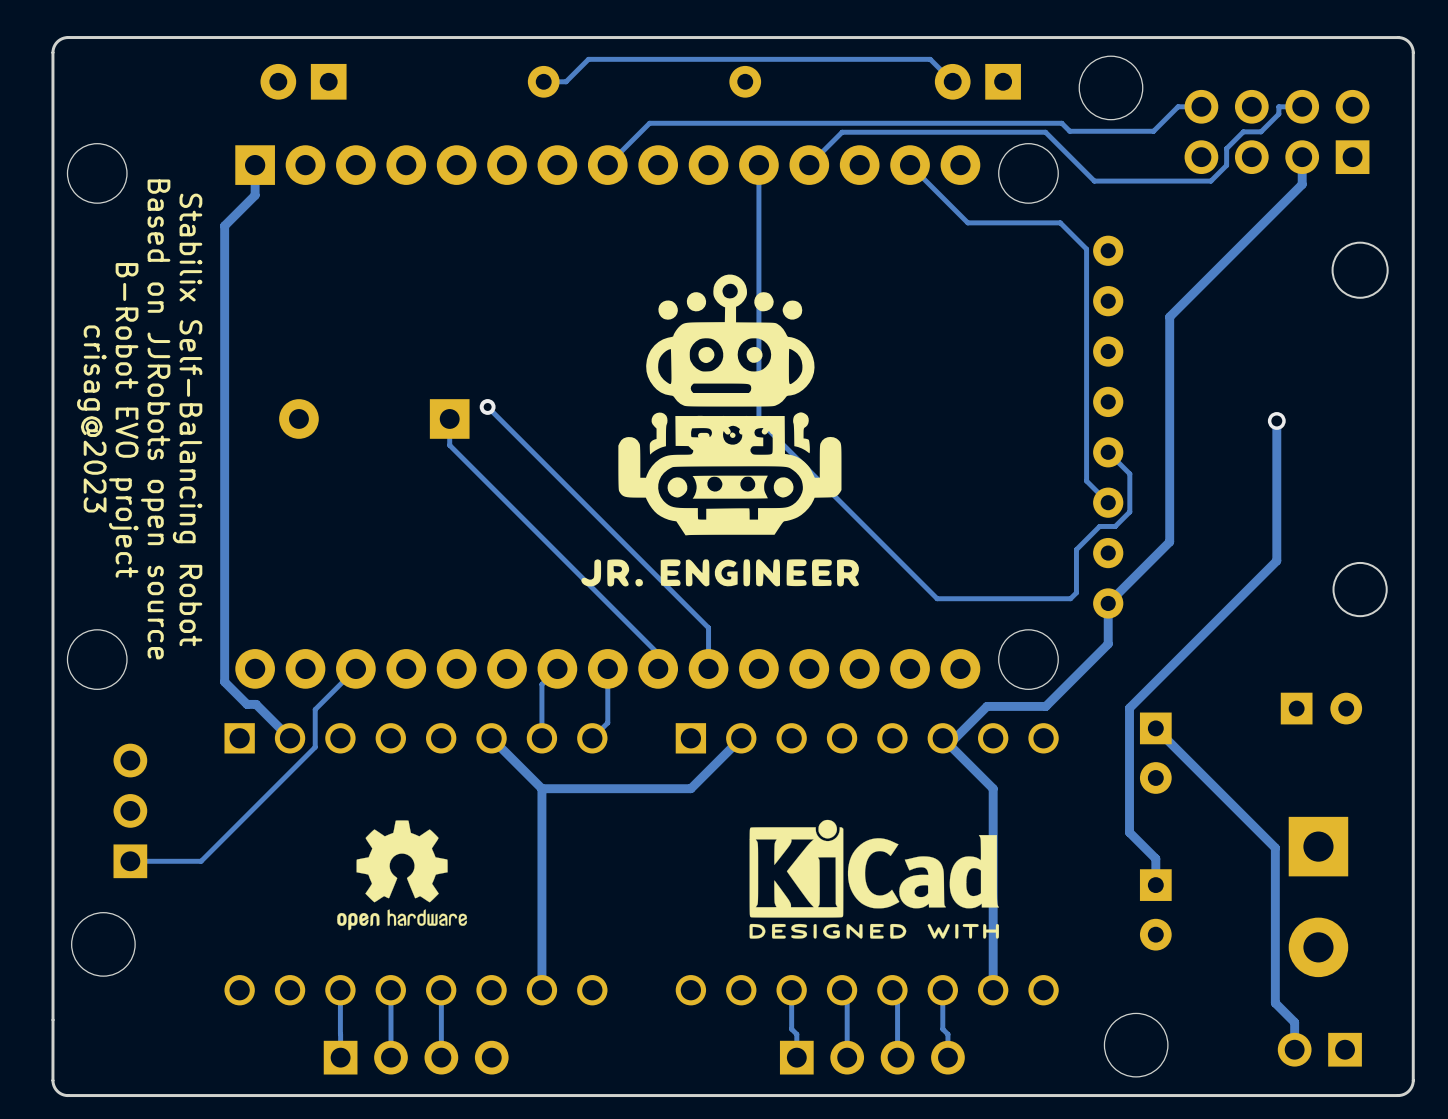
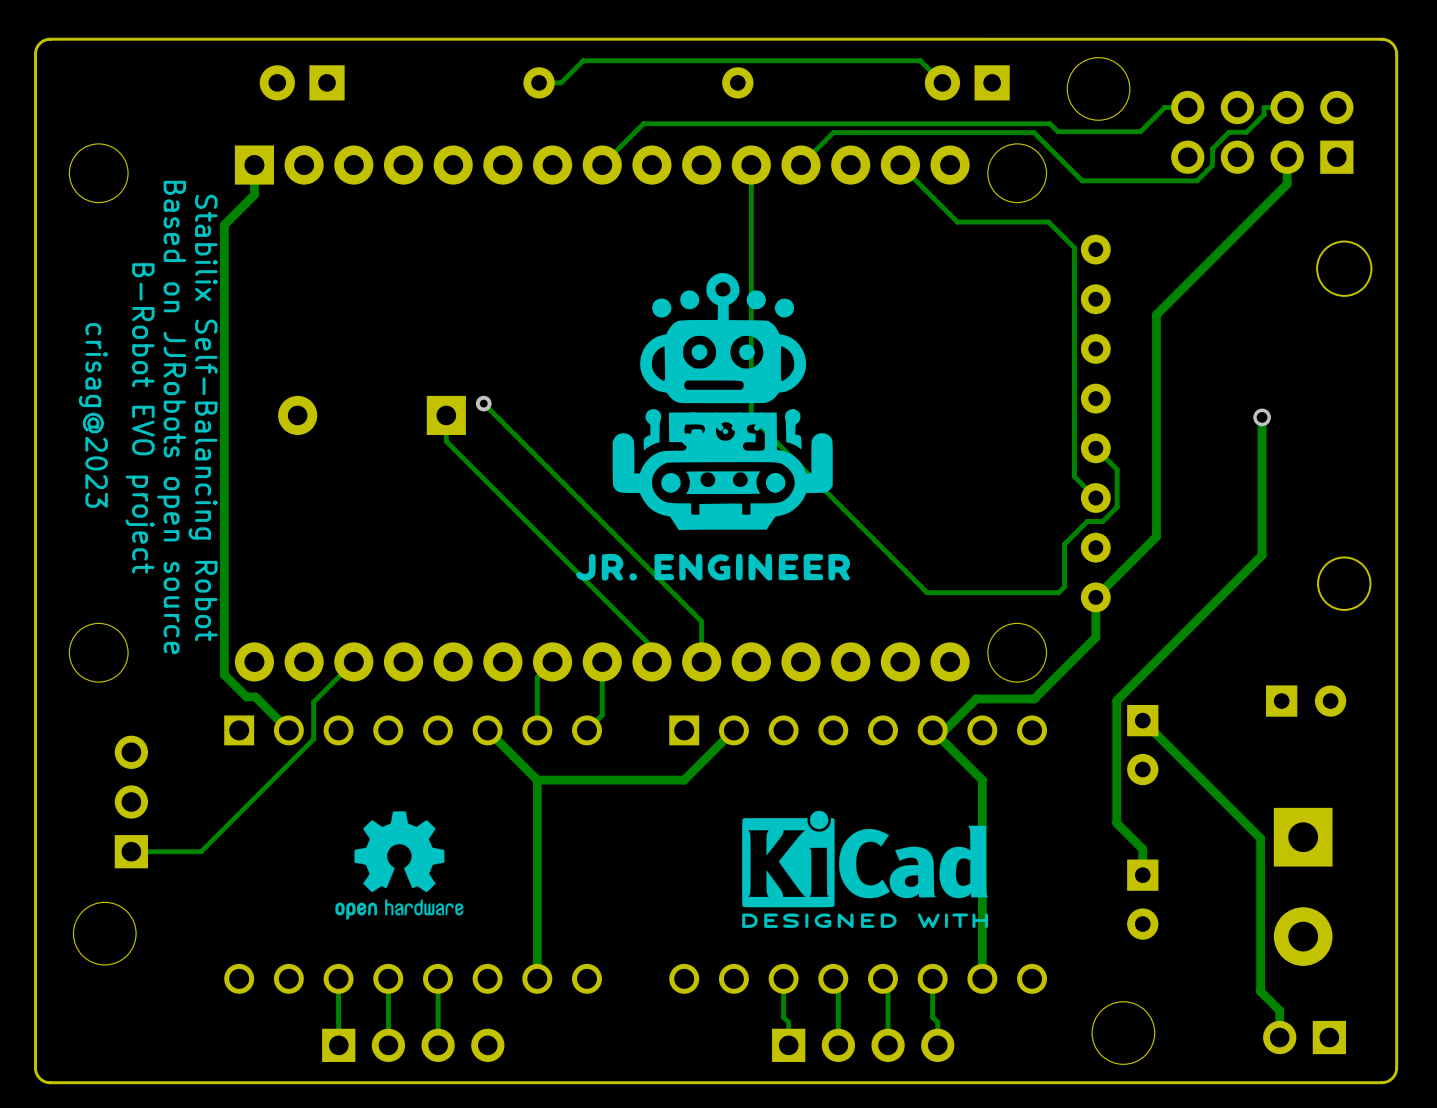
board edge: (68, 37) (57, 41) (52, 52) (52, 1080) (57, 1091) (68, 1095) -> (69, 39) (43, 40) (37, 46) (35, 54) (35, 1069) (38, 1077) (45, 1081) (70, 1082)
text position: Based on JJRobots open source (155, 419) -> Based on JJRobots open source (171, 417)
text position: Stabilix Self-Balancing Robot (187, 419) -> Stabilix Self-Balancing Robot (203, 417)
text position: B-Robot EVO project (123, 420) -> B-Robot EVO project (140, 418)

